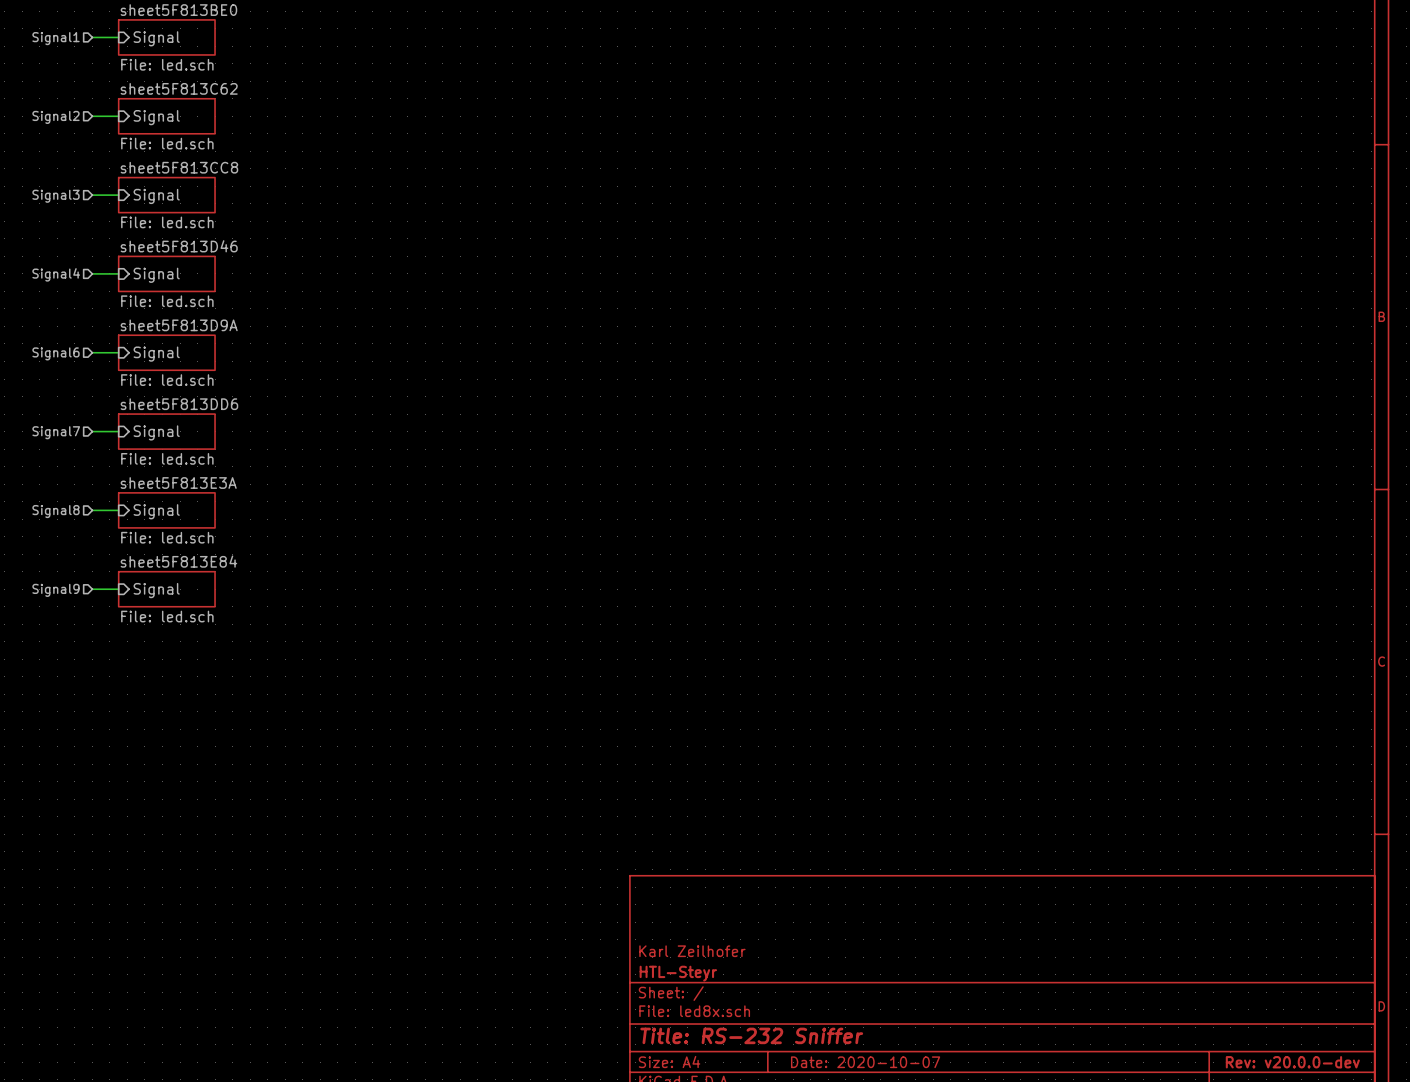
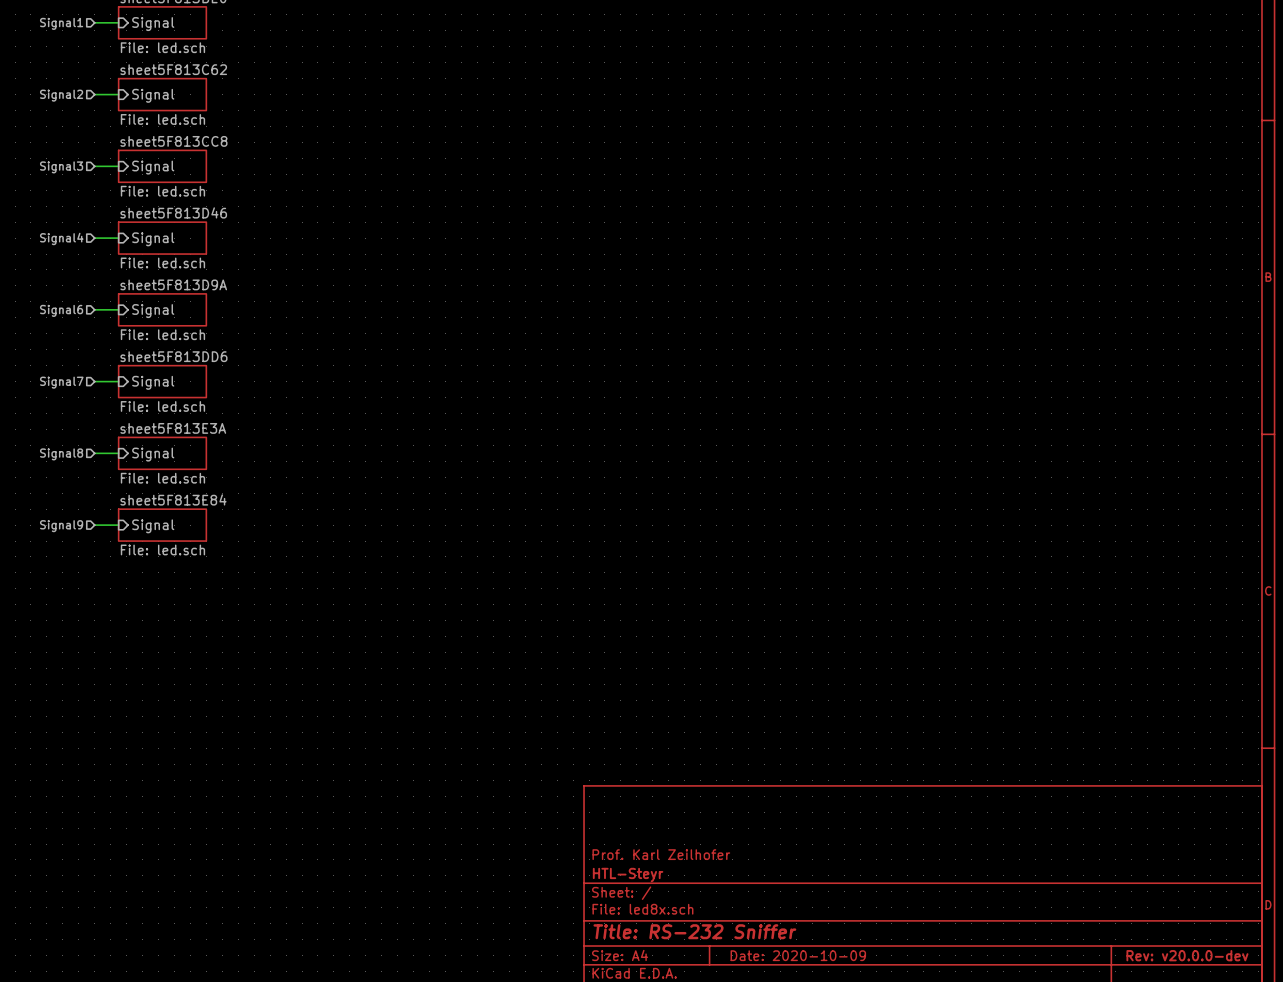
title block: Karl Zeilhofer (692, 951) -> Prof. Karl Zeilhofer (661, 854)
title block: Date: 2020-10-07 (865, 1062) -> Date: 2020-10-09 (798, 955)

